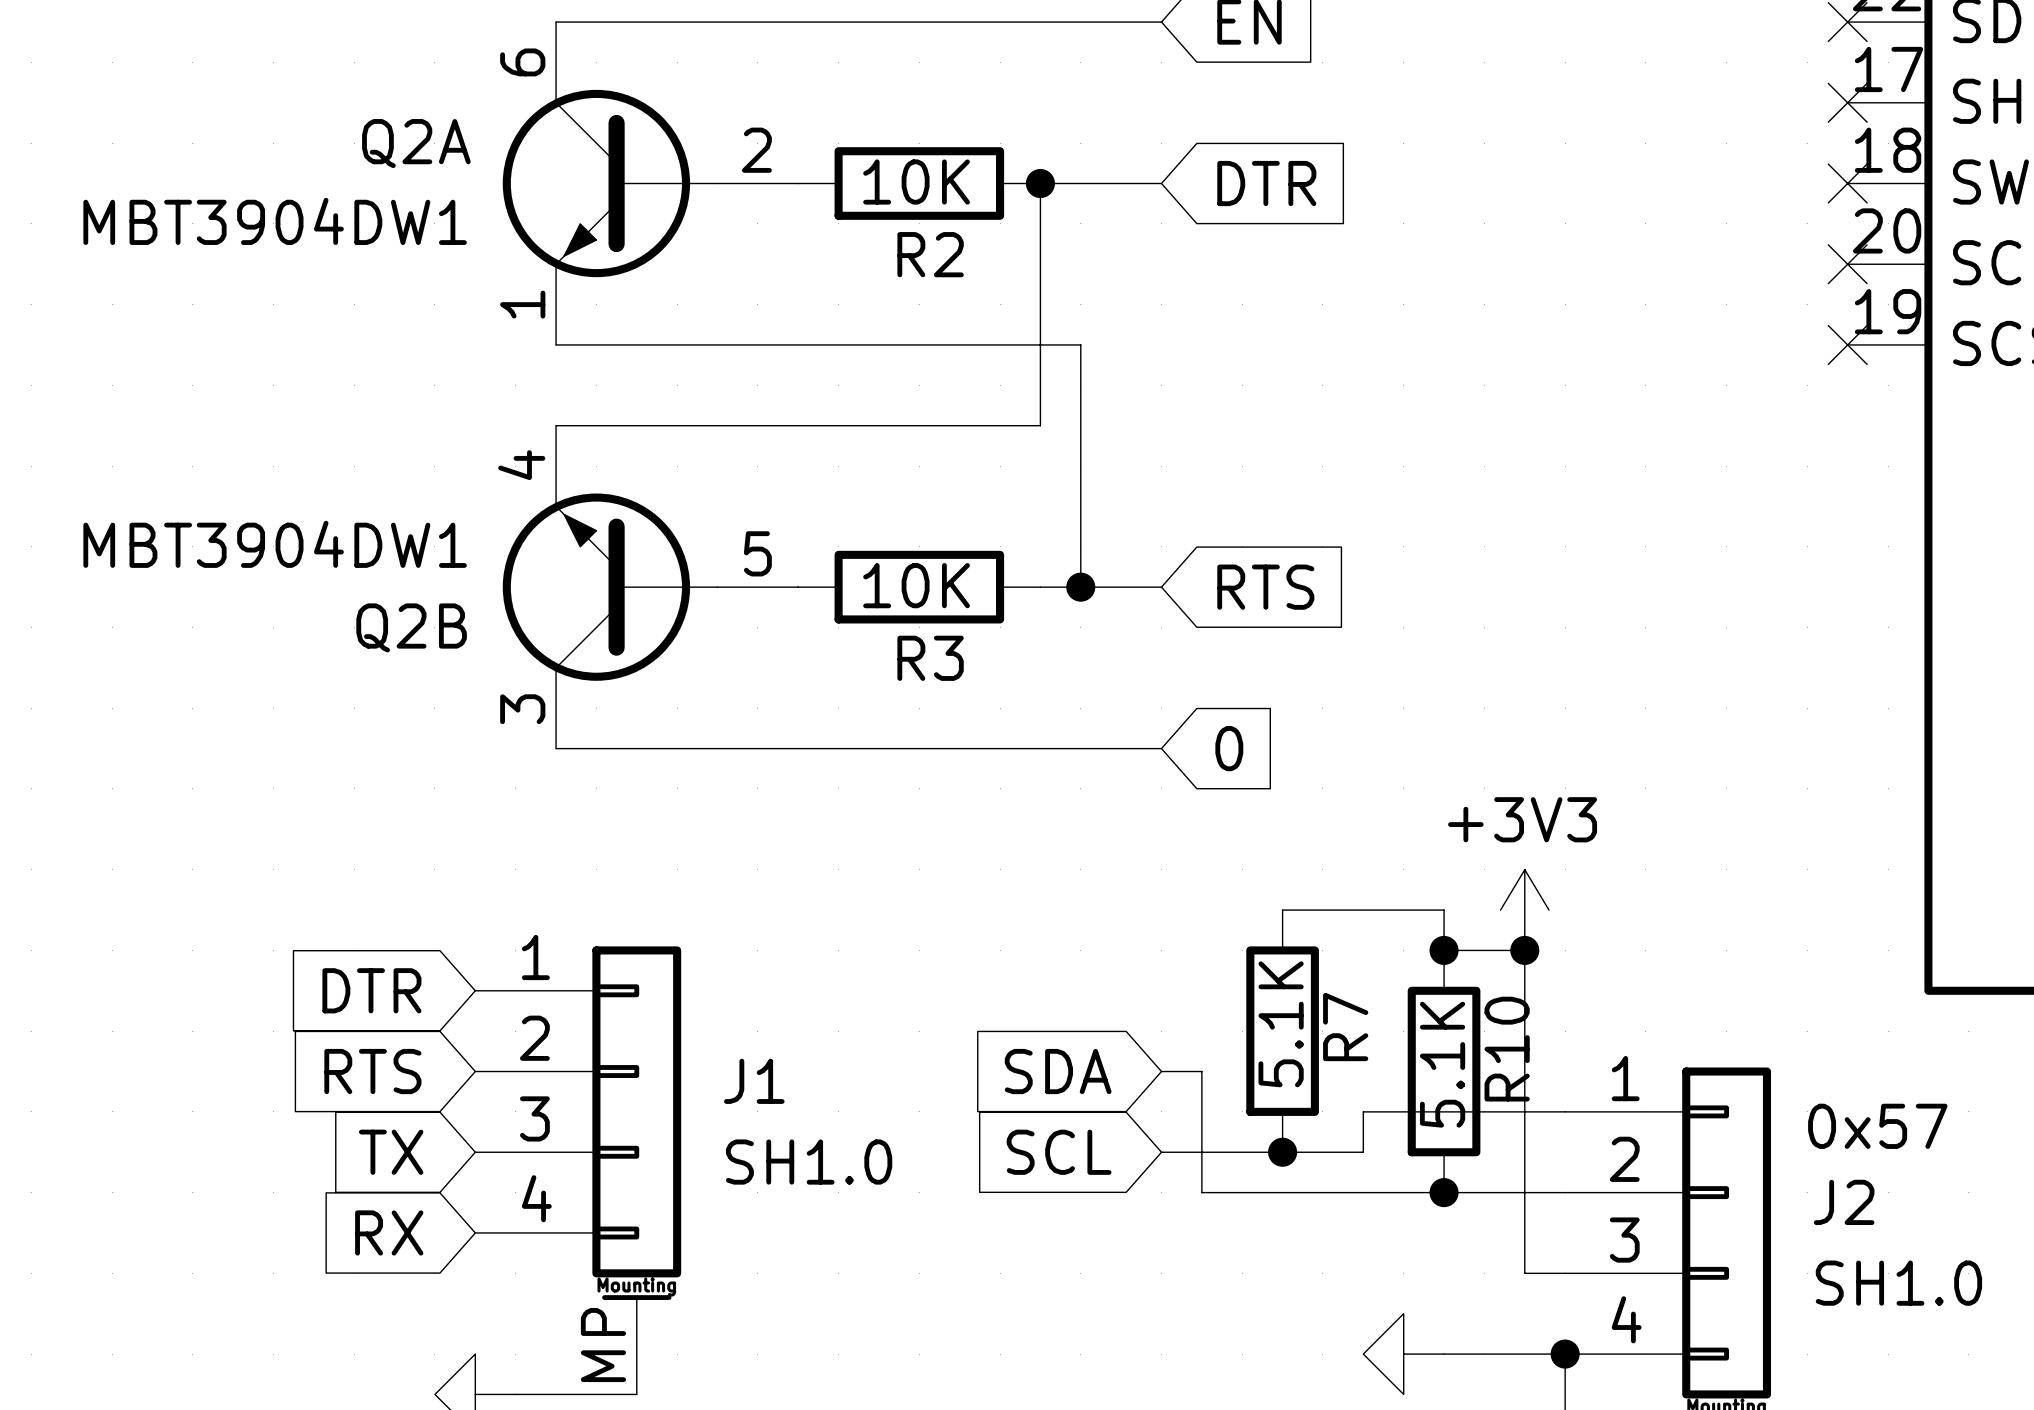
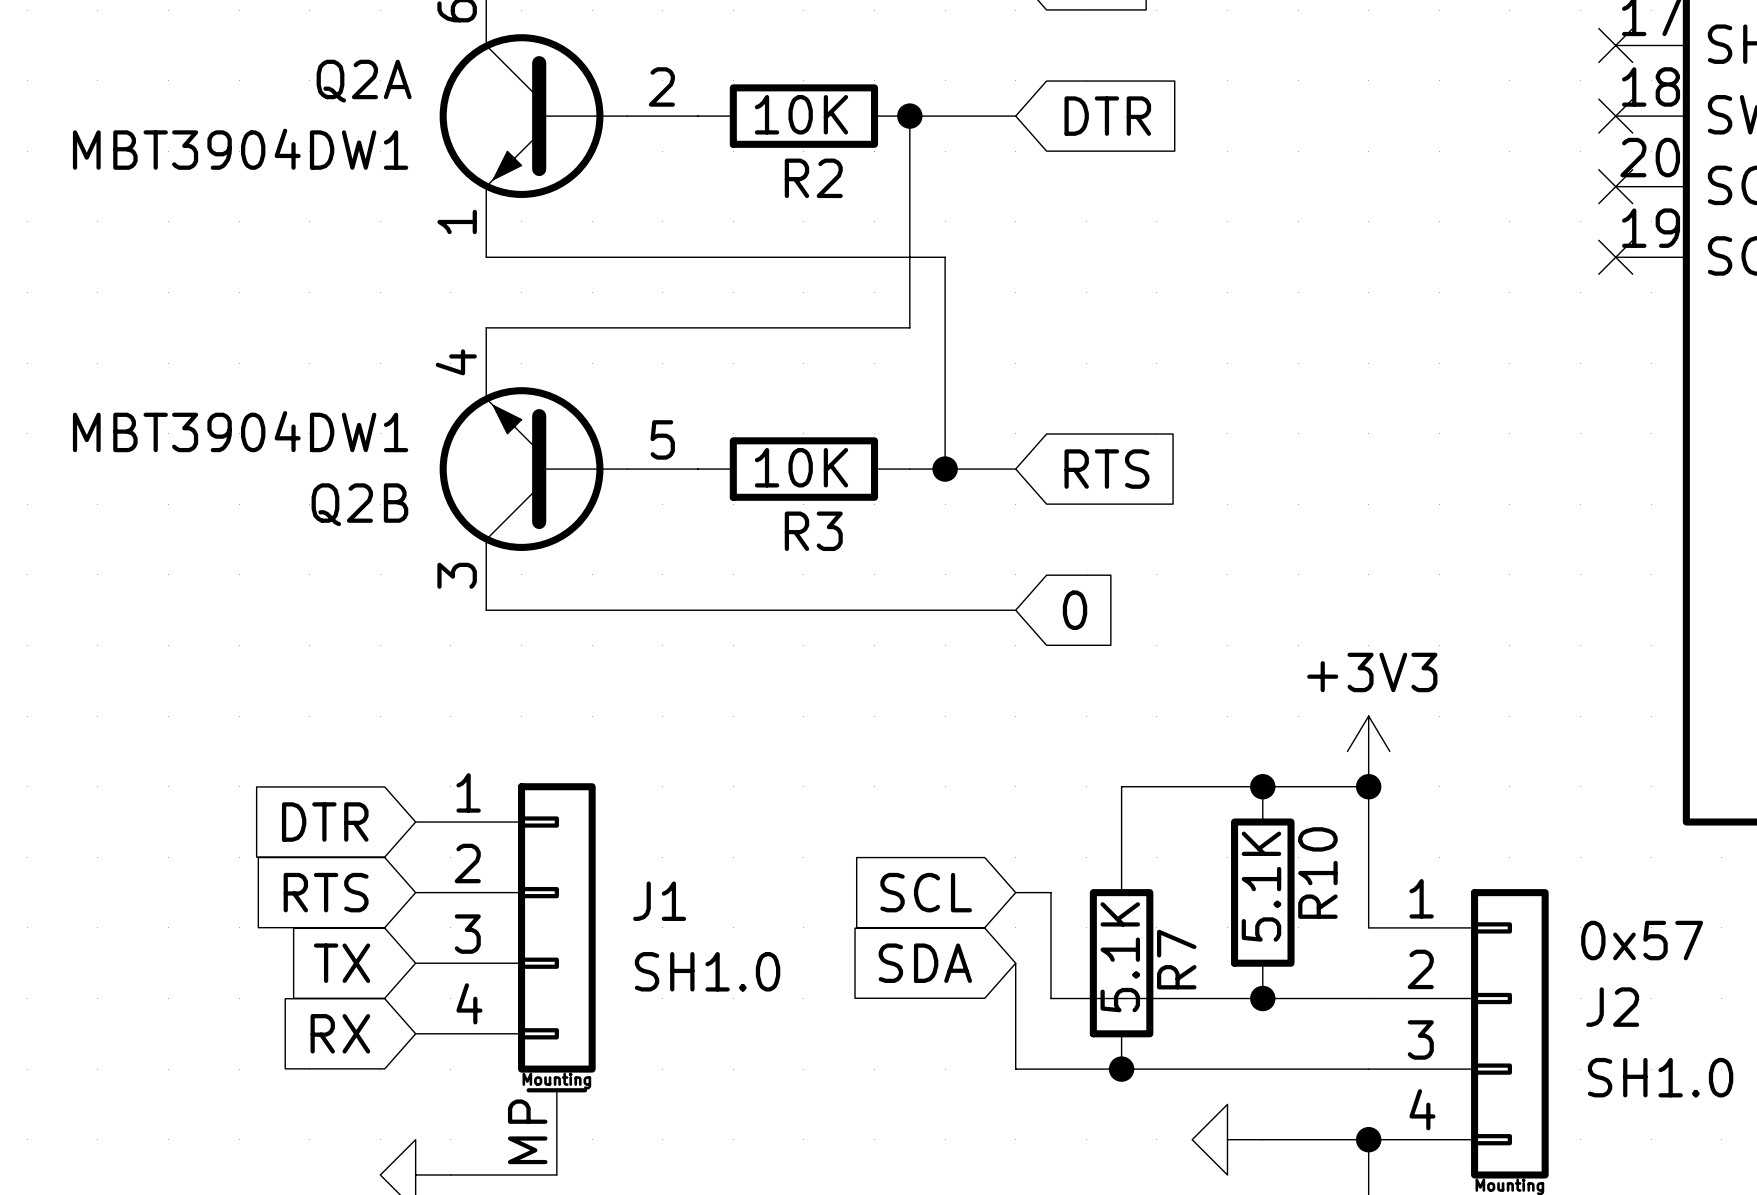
power symbol text position: +3V3 (1522, 819) -> +3V3 (1372, 672)
wire: (1282, 910) (1444, 910) (1444, 950) -> (1121, 857) (1121, 786) (1262, 786)
power symbol position: +3V3 (1524, 910) -> +3V3 (1368, 751)
wire: (1524, 950) (1524, 1273) -> (1333, 786) (1368, 786) (1368, 927)
junction position: (1524, 950) -> (1368, 786)
R7 position: (1282, 1031) -> (1121, 963)
global label: SDA (1058, 1071) -> SCL (926, 892)
wire: (1565, 1111) (1363, 1111) (1363, 1152) (1161, 1152) -> (1333, 1069) (1015, 1069) (1015, 963)
global label: SCL (1059, 1152) -> SDA (925, 963)
junction position: (1282, 1152) -> (1121, 1069)

